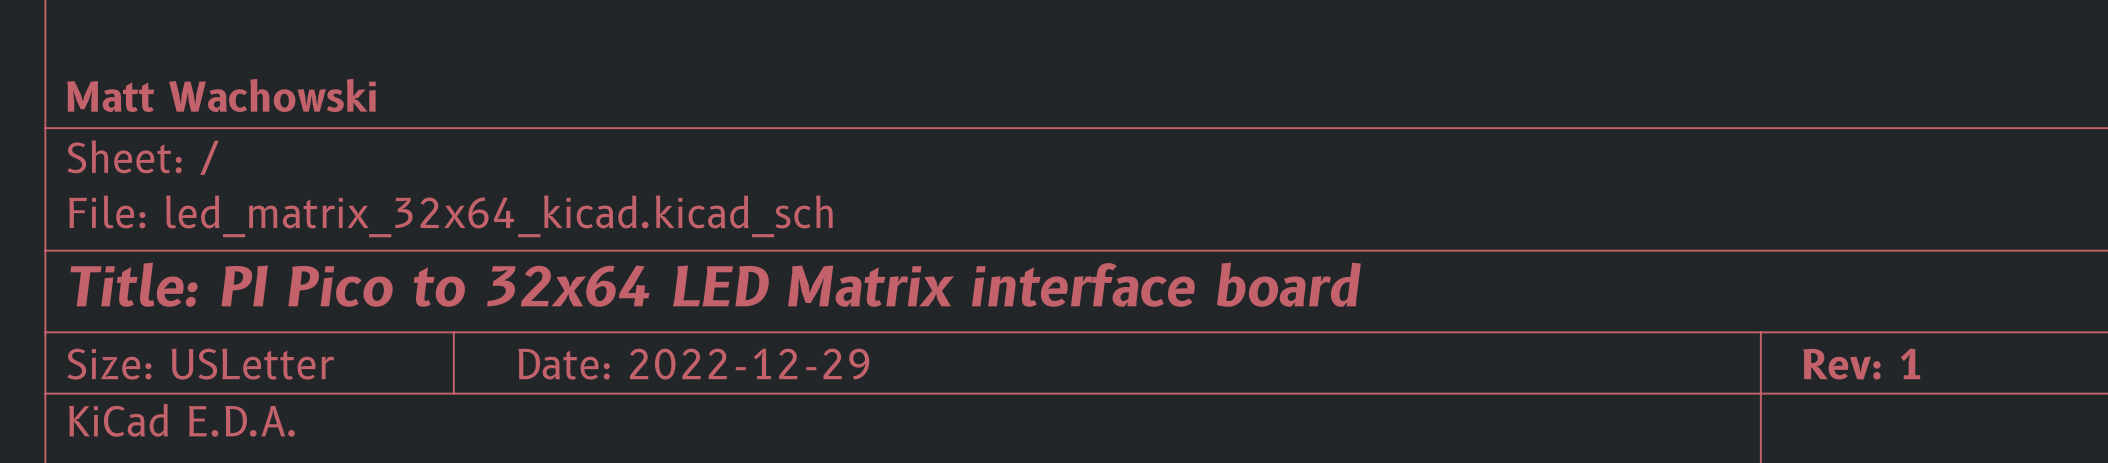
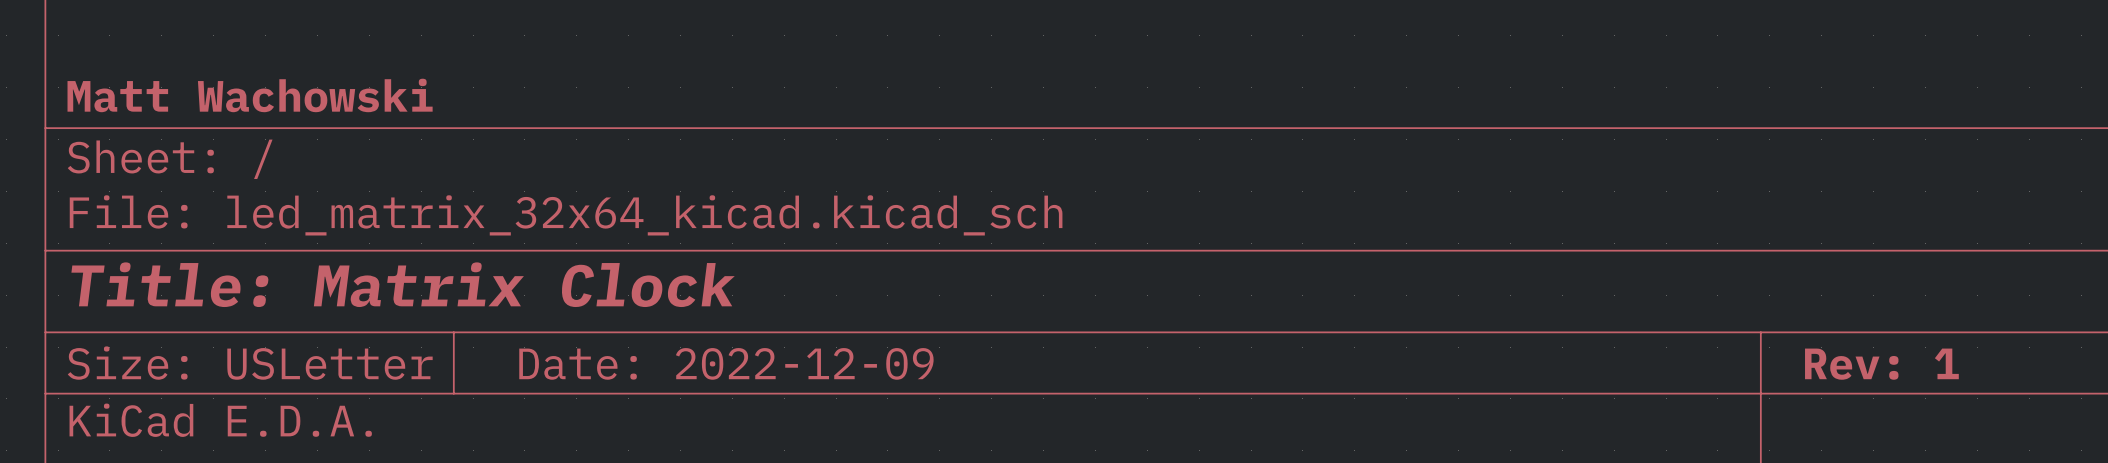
title block: Title: PI Pico to 32x64 LED Matrix interface board (715, 284) -> Title: Matrix Clock (403, 284)
title block: Date: 2022-12-29 (693, 364) -> Date: 2022-12-09 (726, 363)

